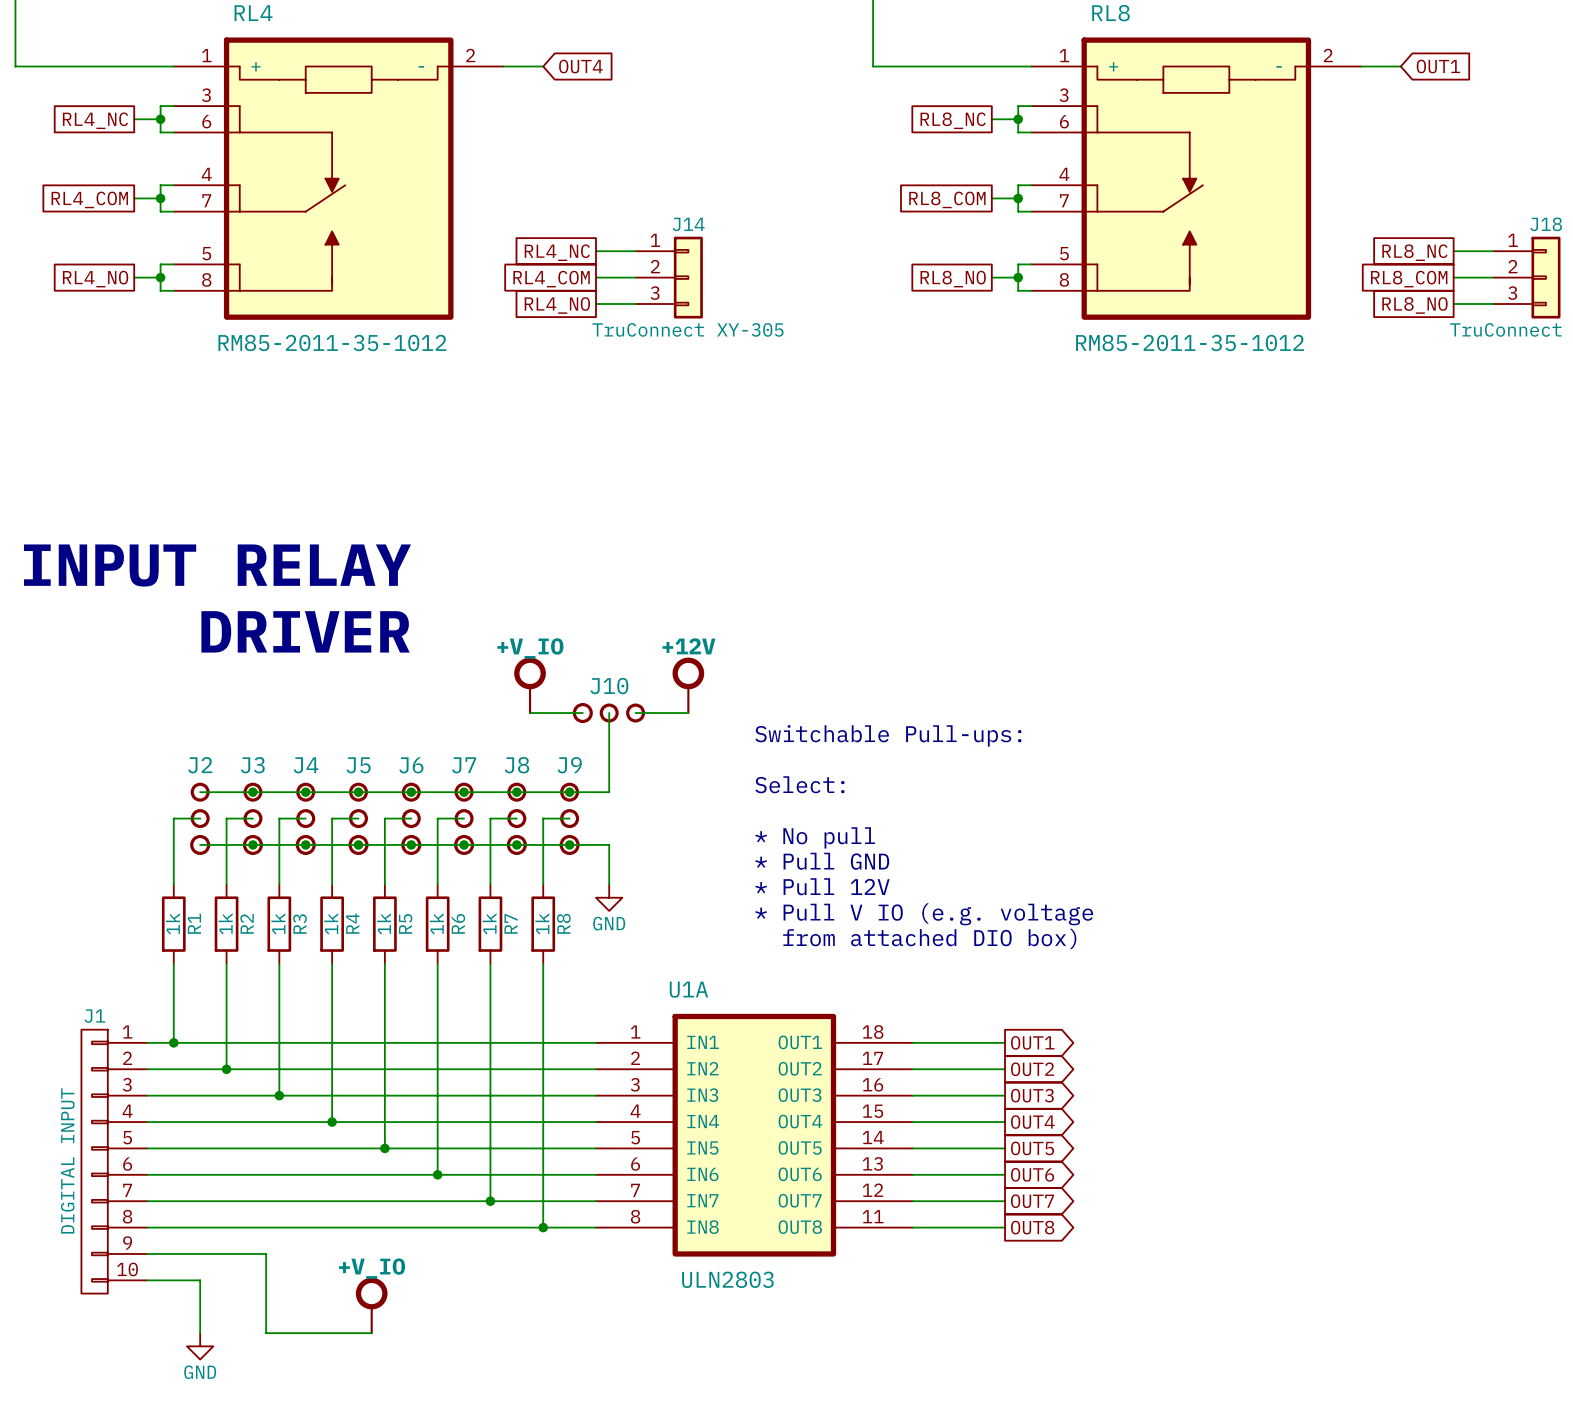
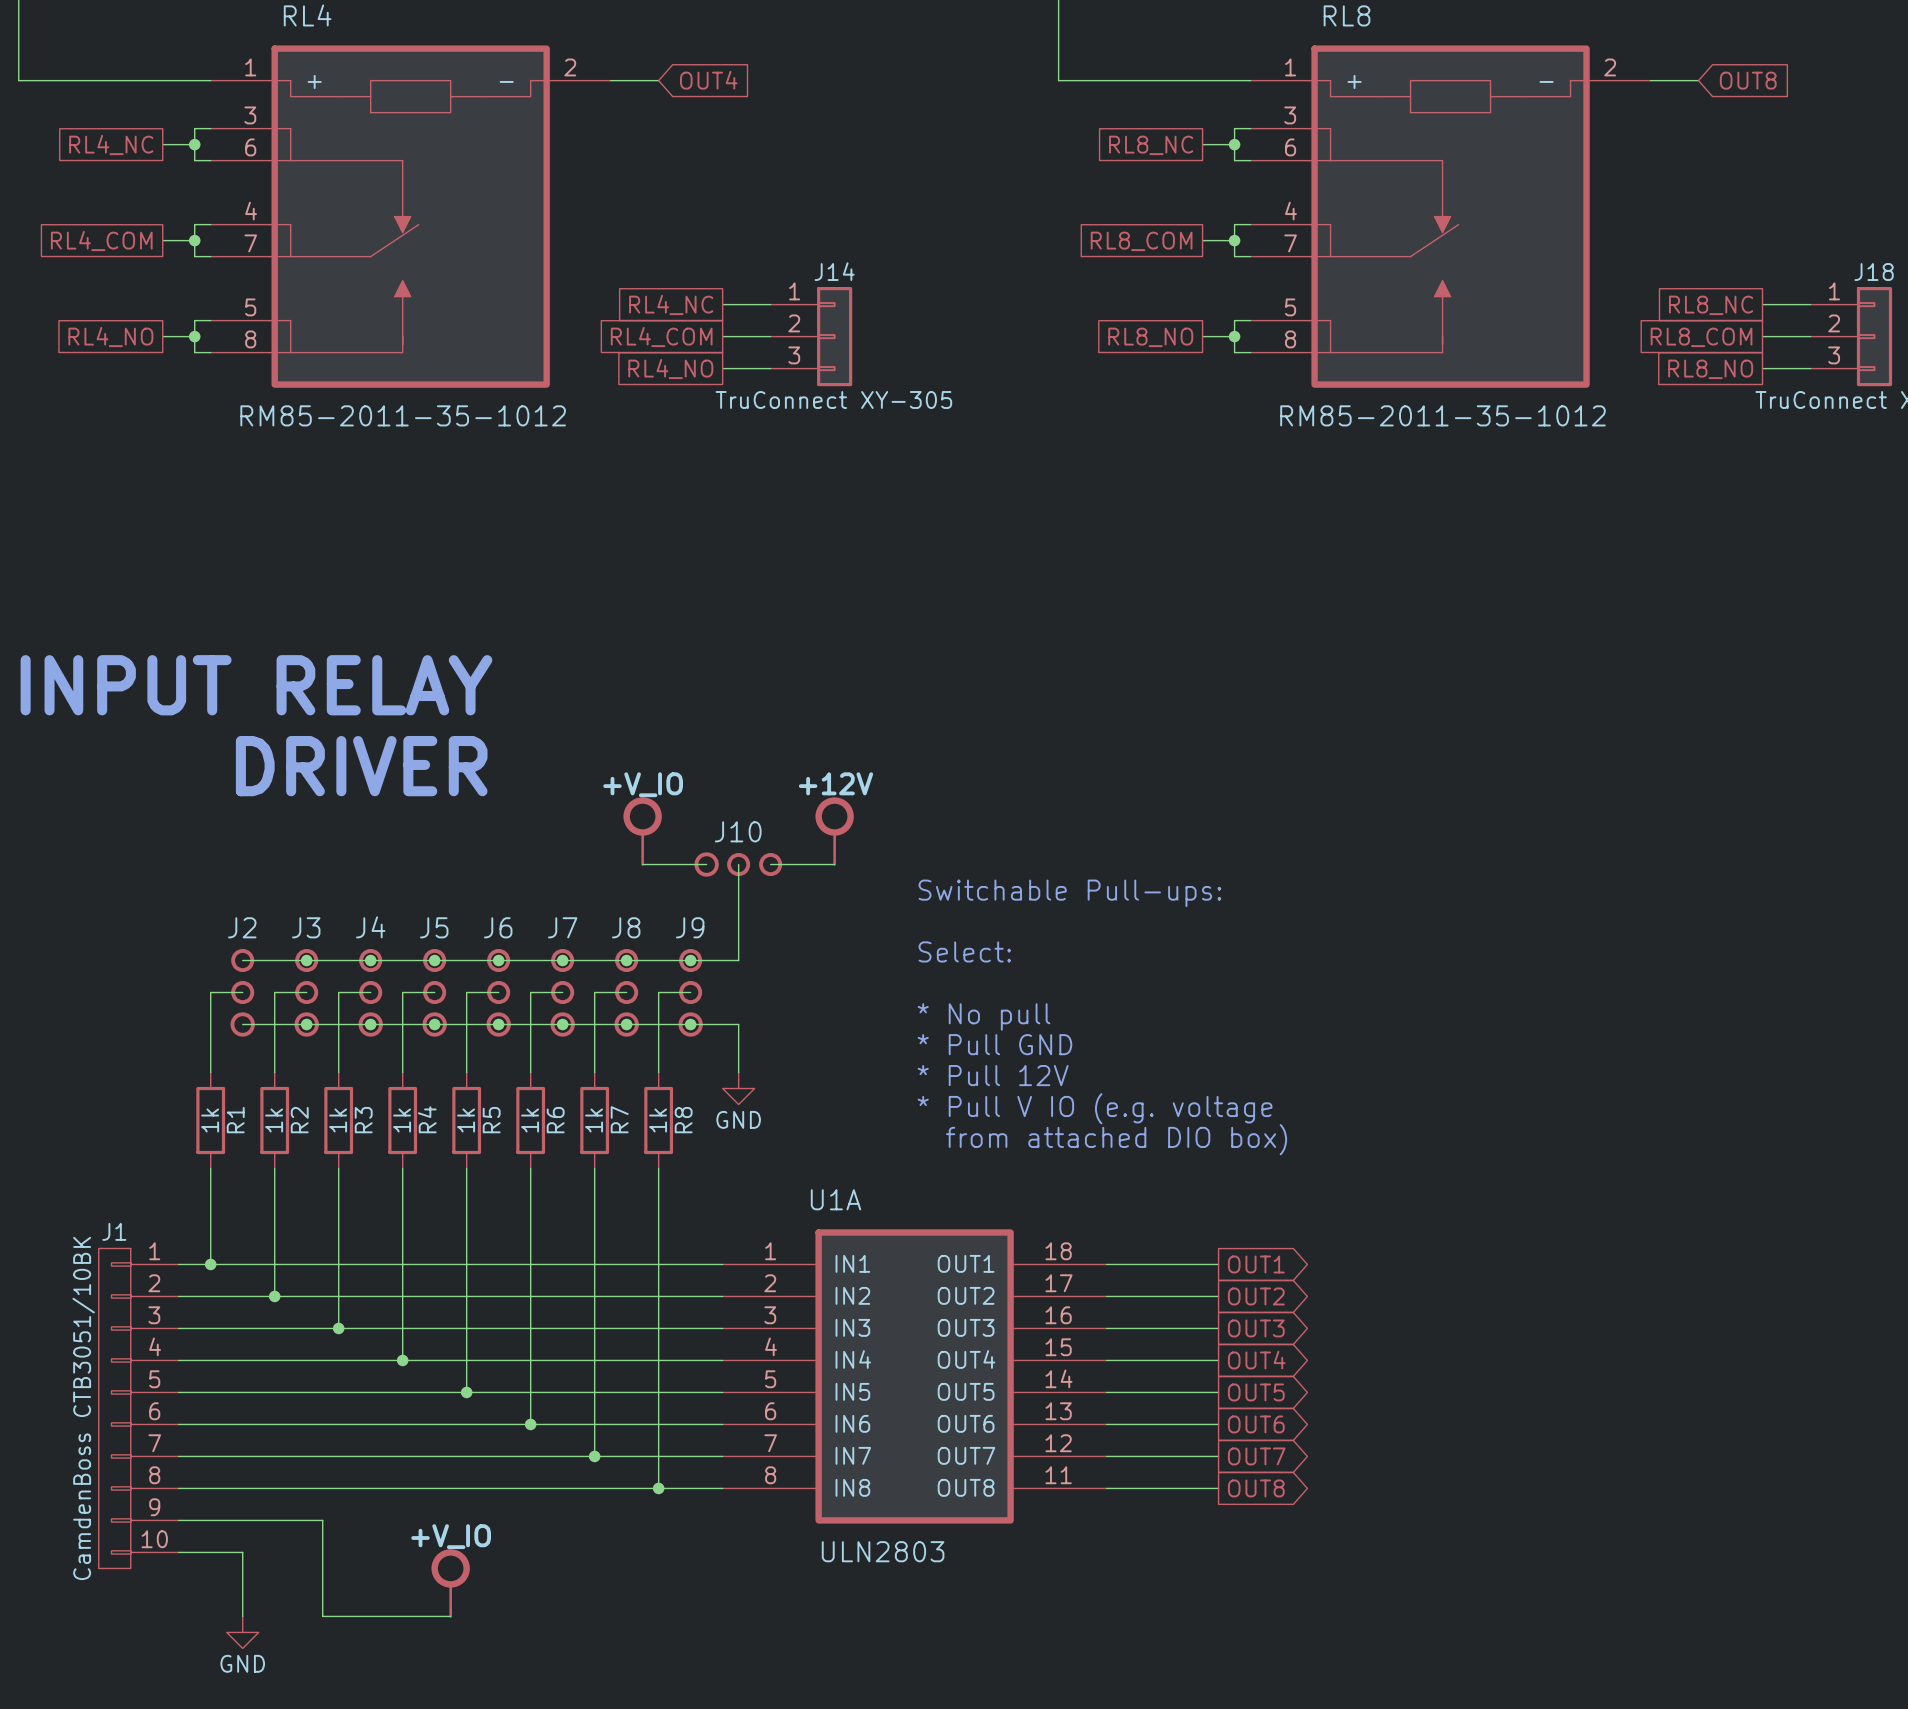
global label: OUT1 (1438, 66) -> OUT8 (1748, 80)
J1 value: DIGITAL INPUT (67, 1160) -> CamdenBoss CTB3051/10BK (83, 1408)

